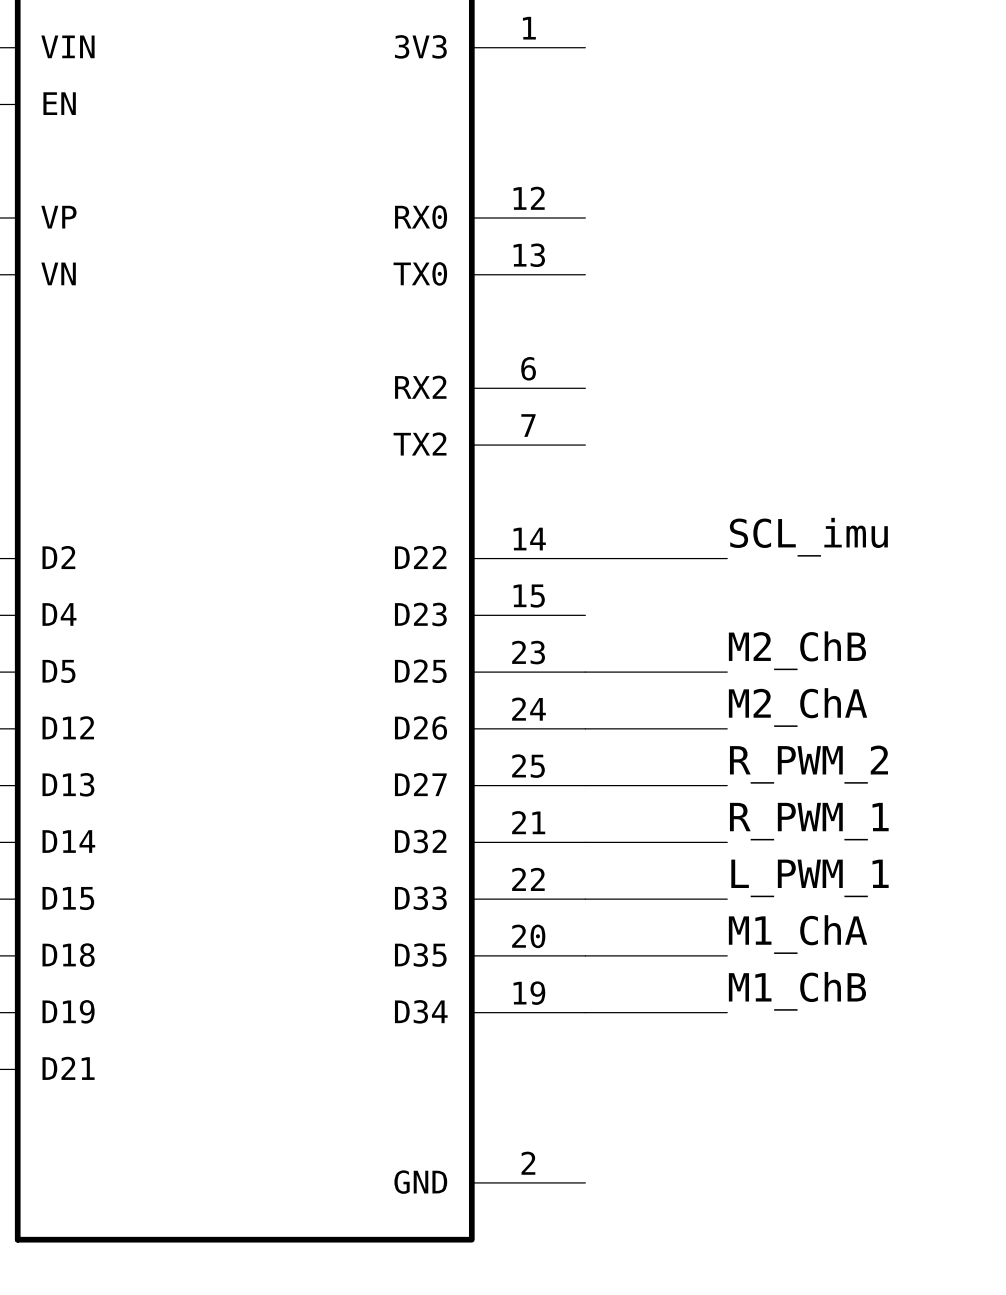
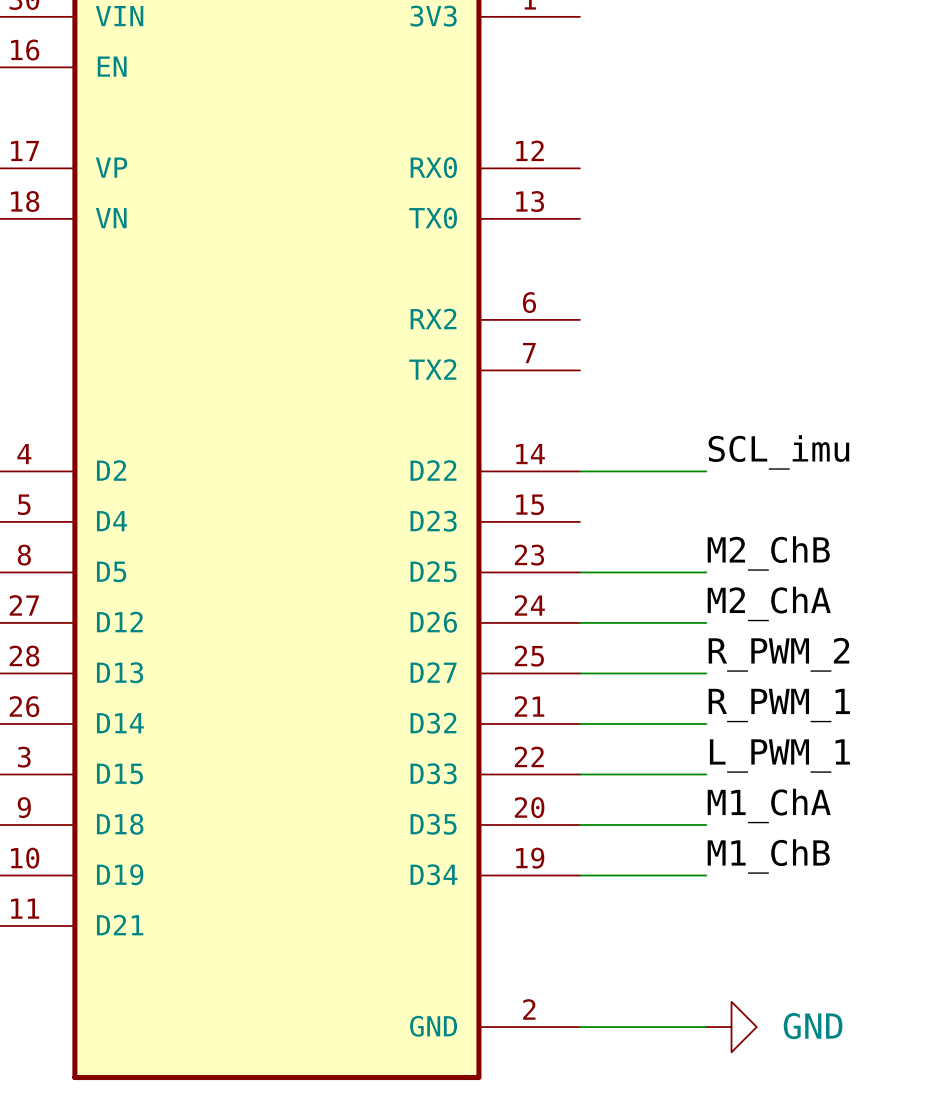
wire: none -> (579, 1027) (706, 1027)
power symbol: none -> GND (731, 1027)

